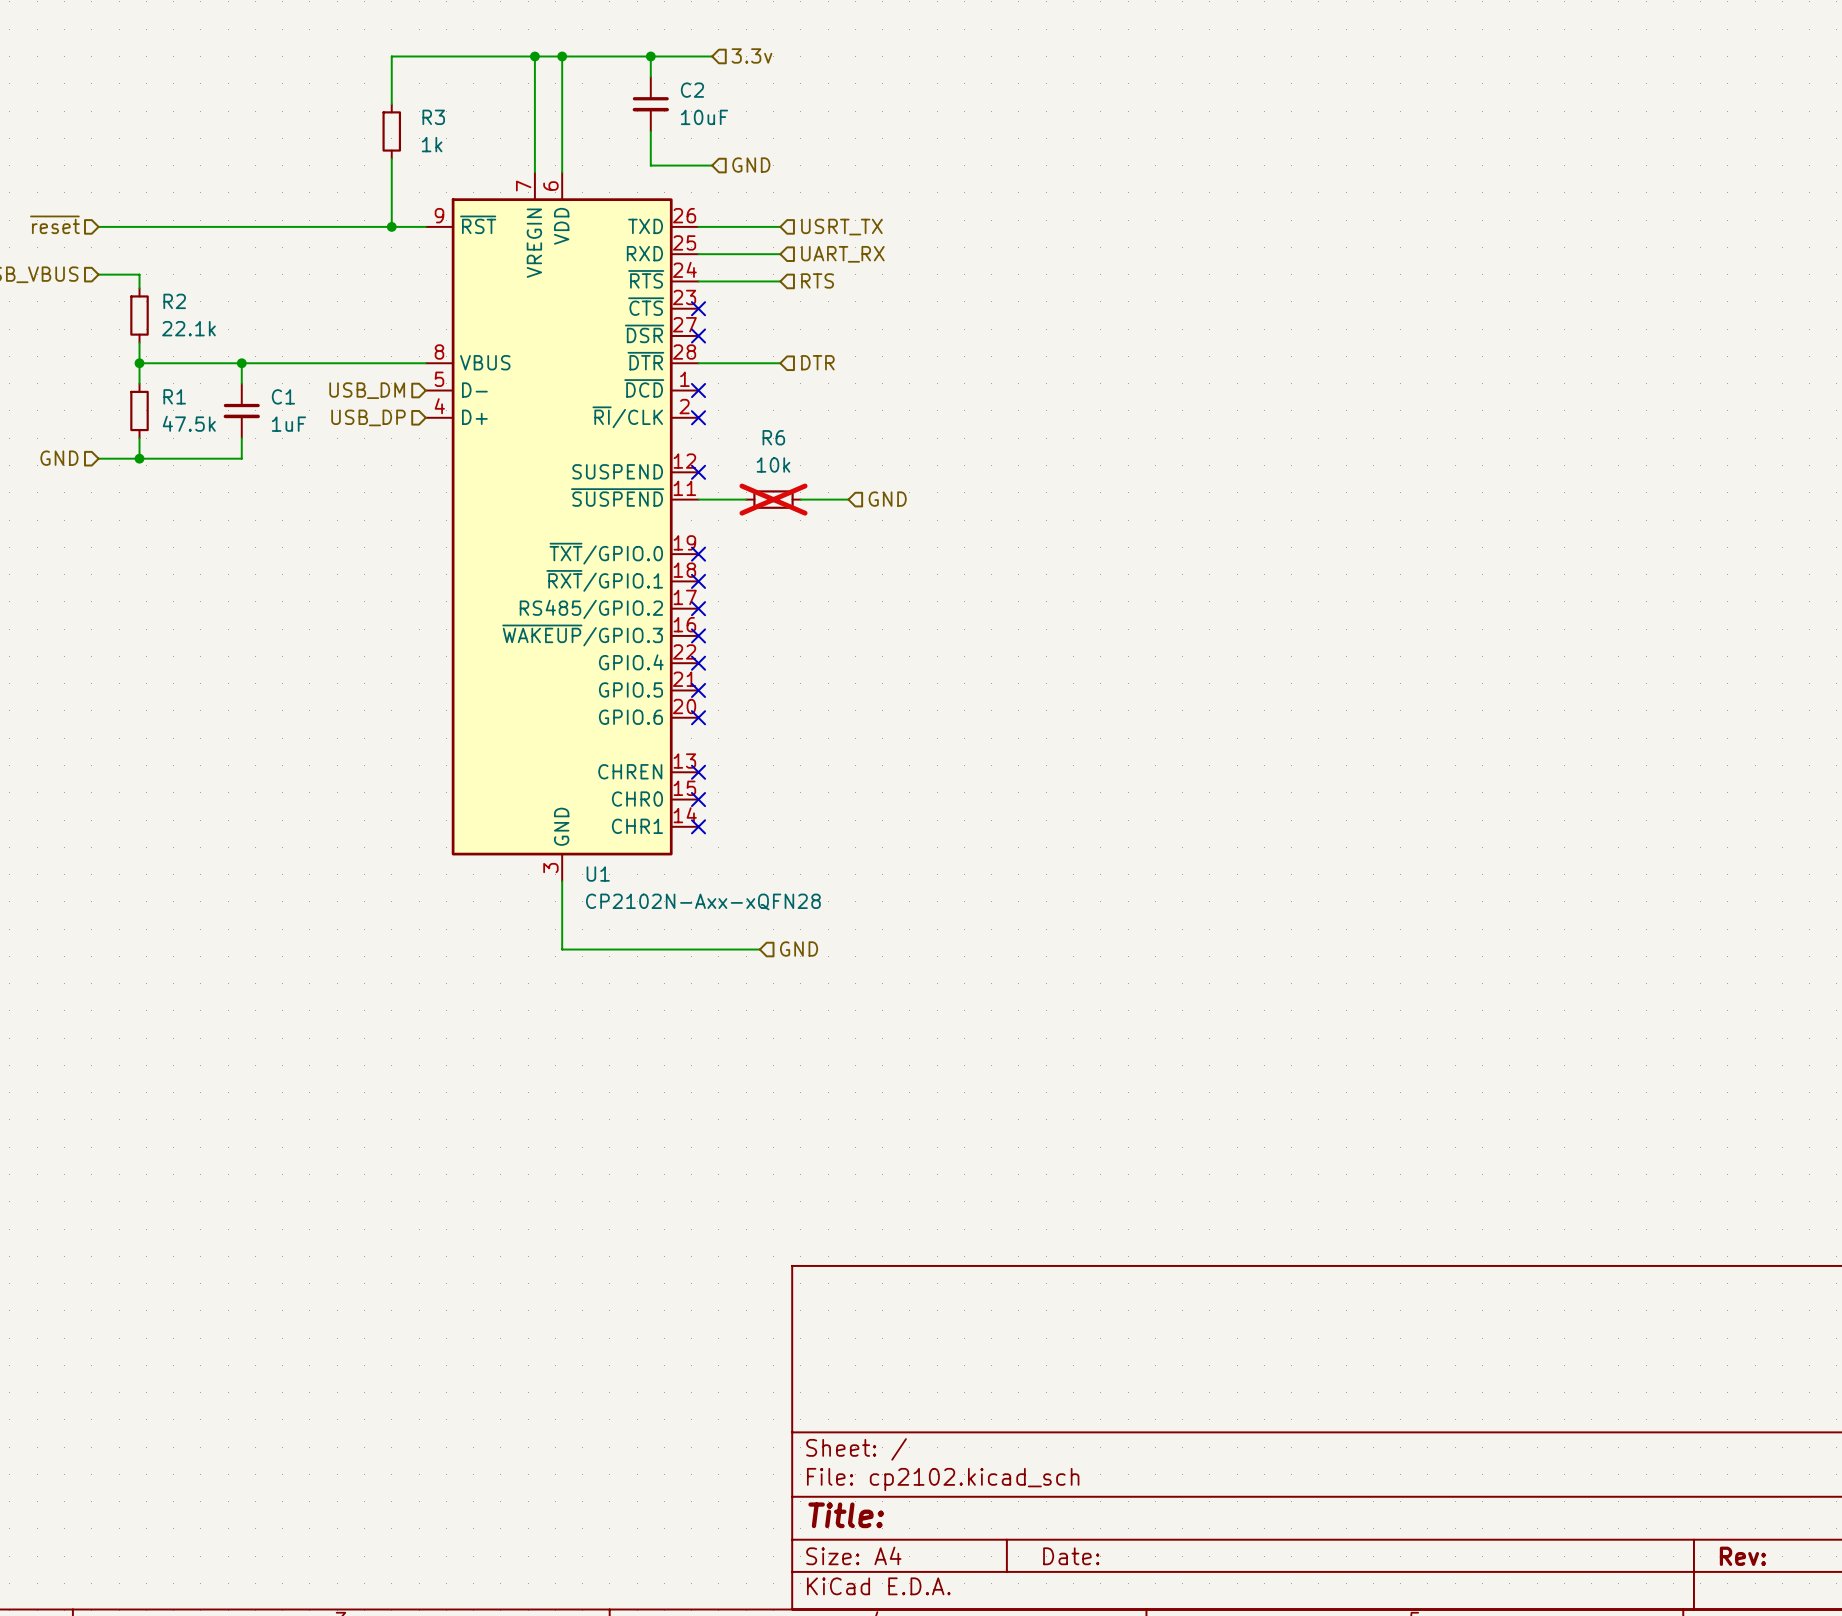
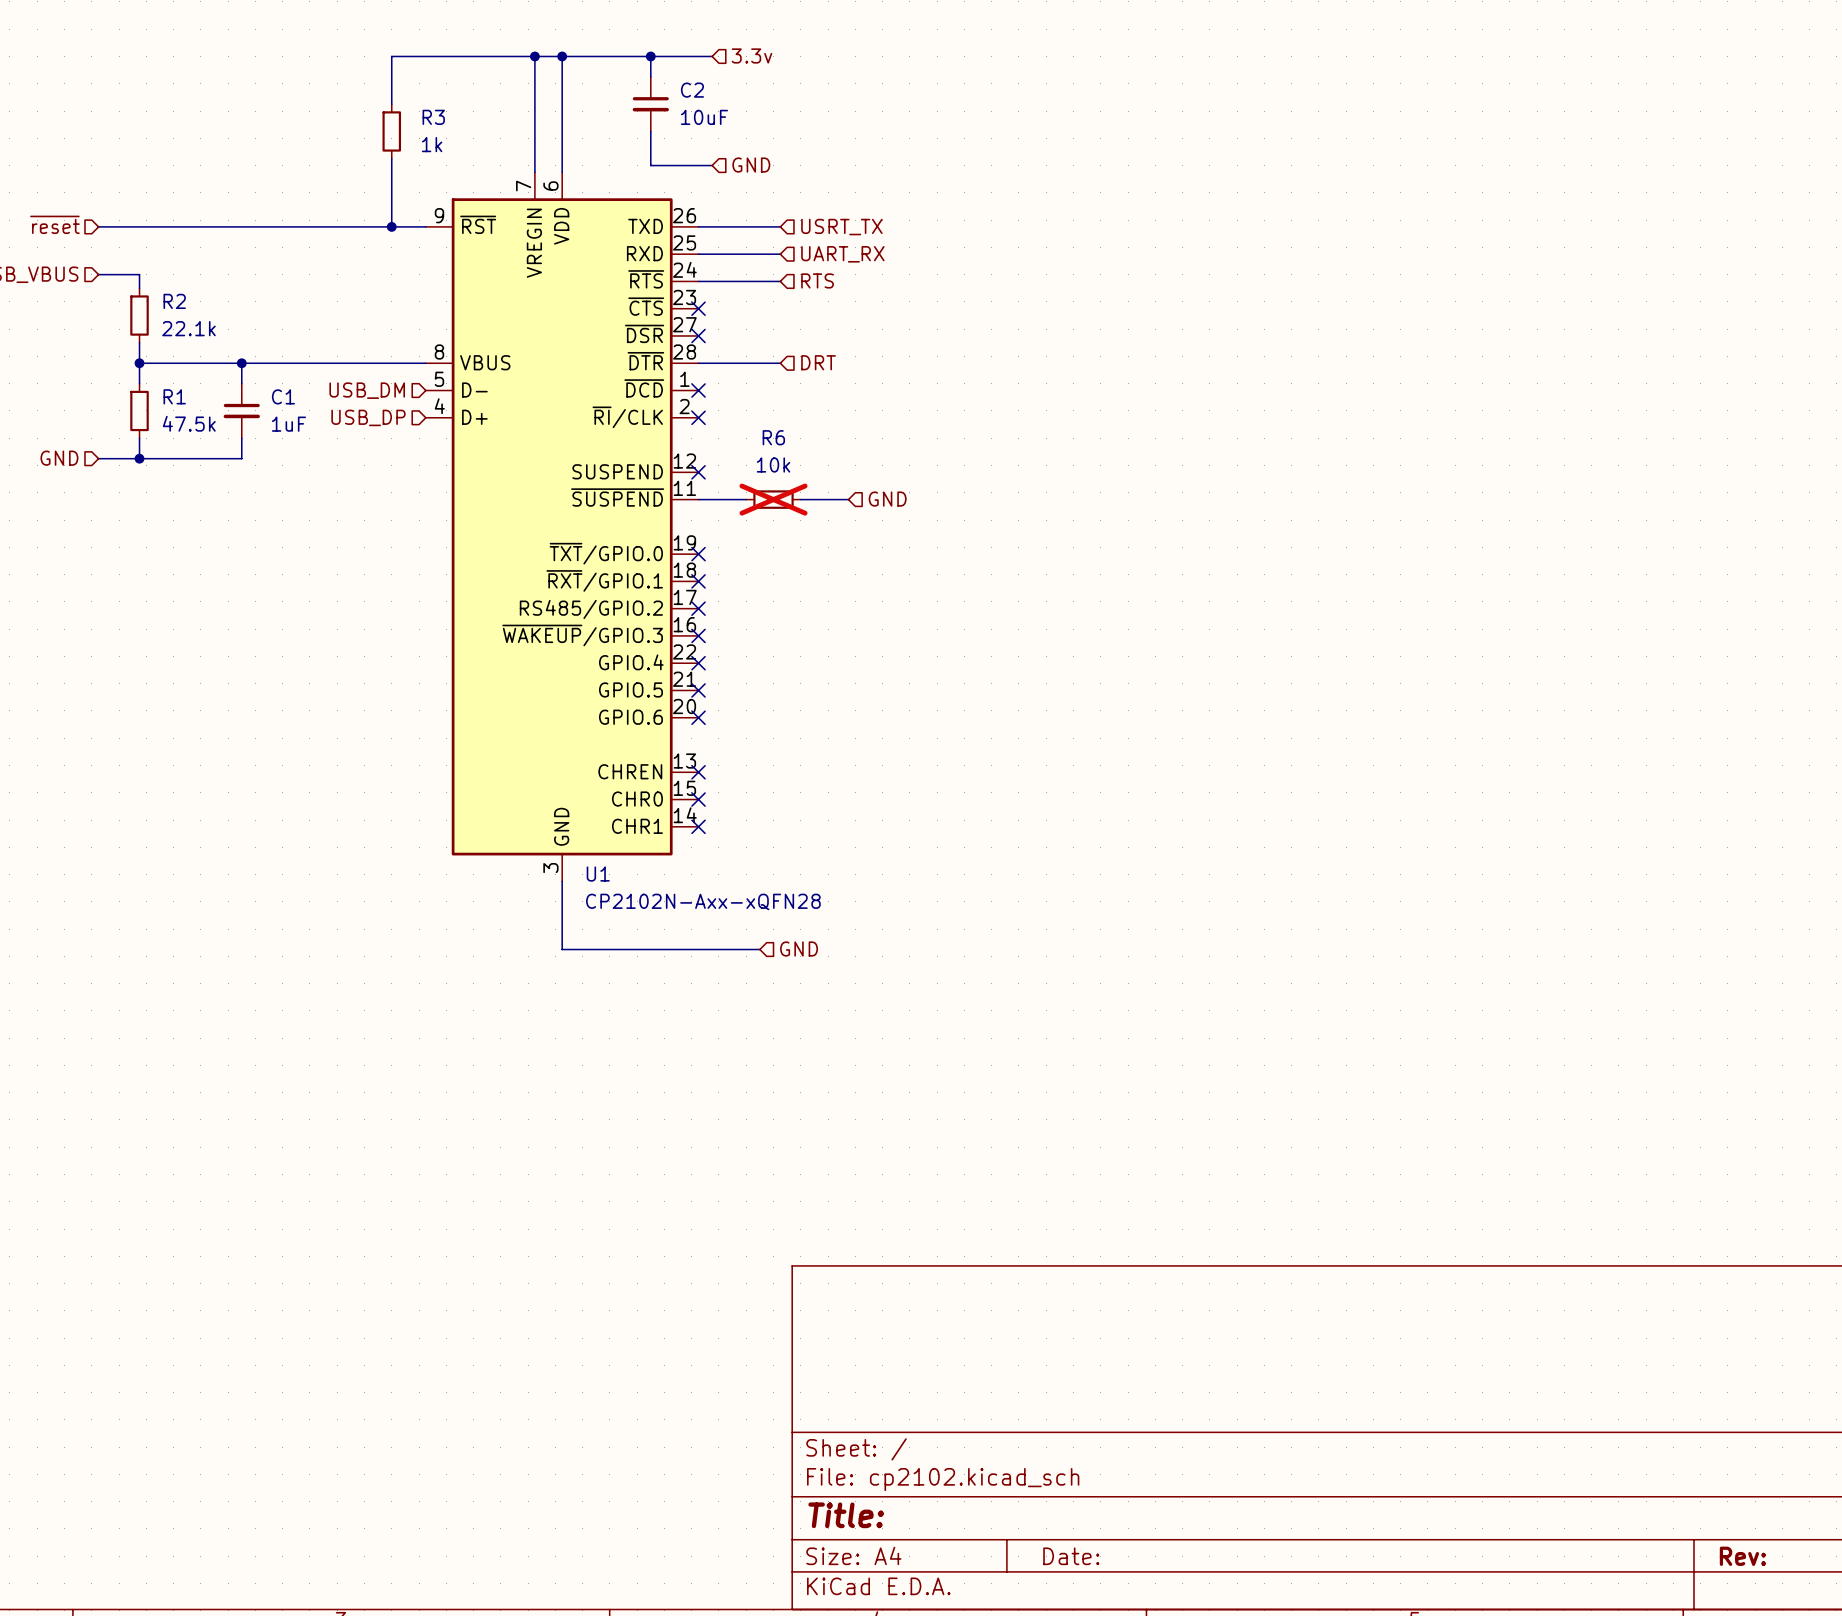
hierarchical label: DTR (817, 362) -> DRT (818, 362)

